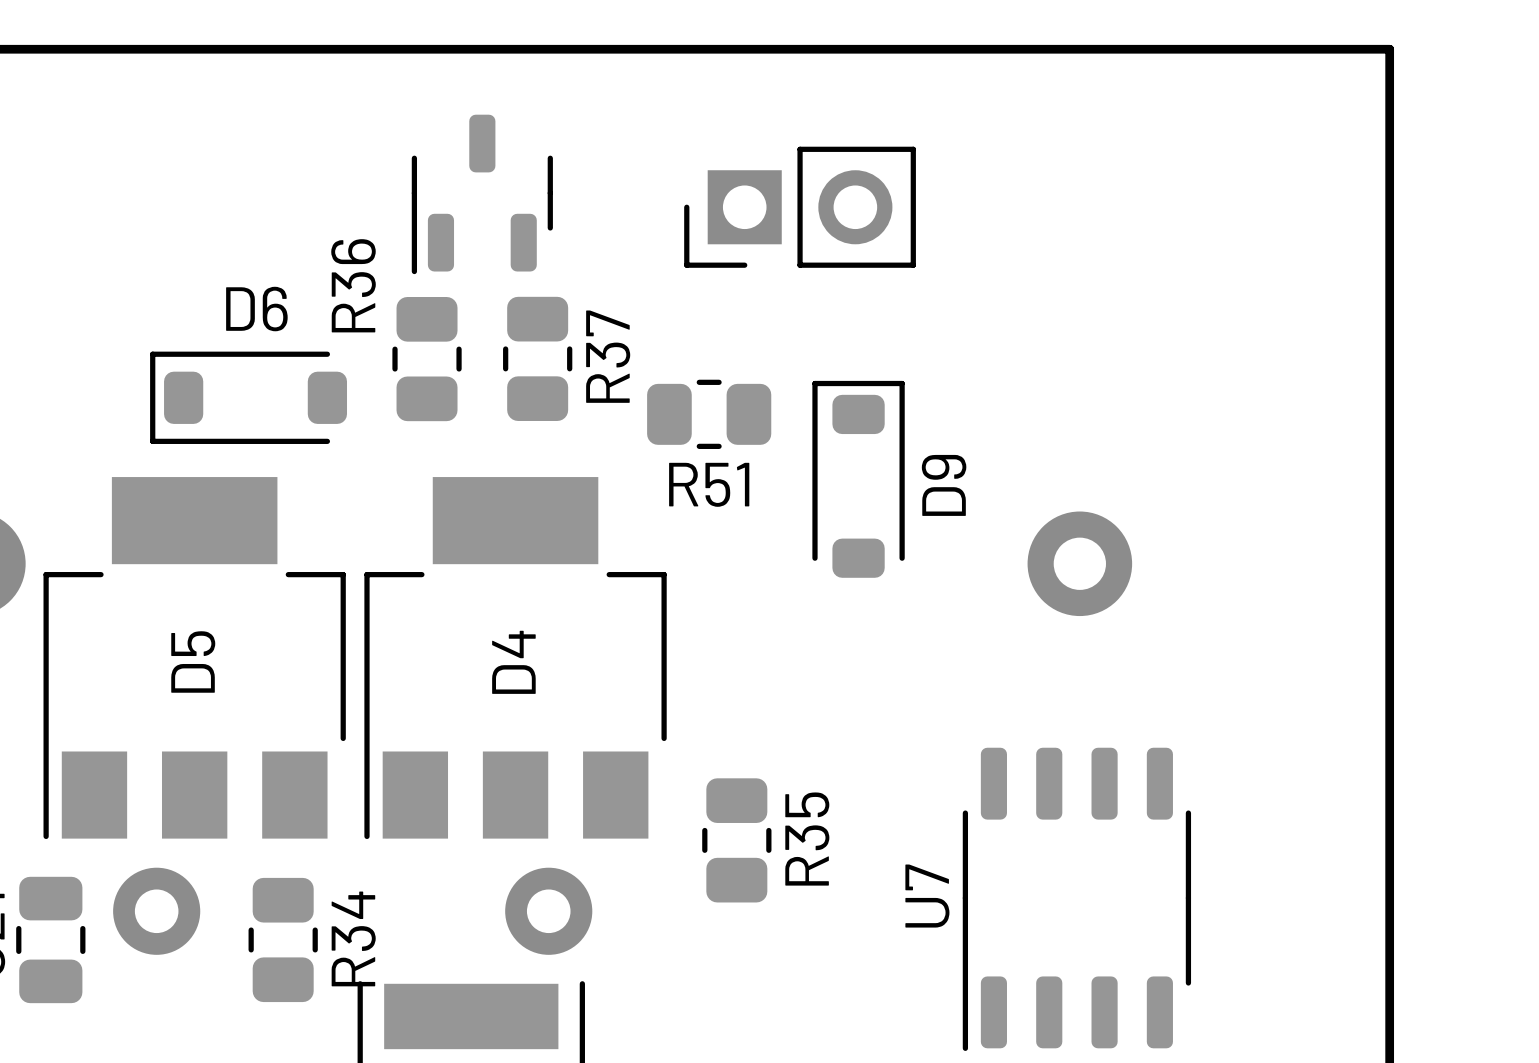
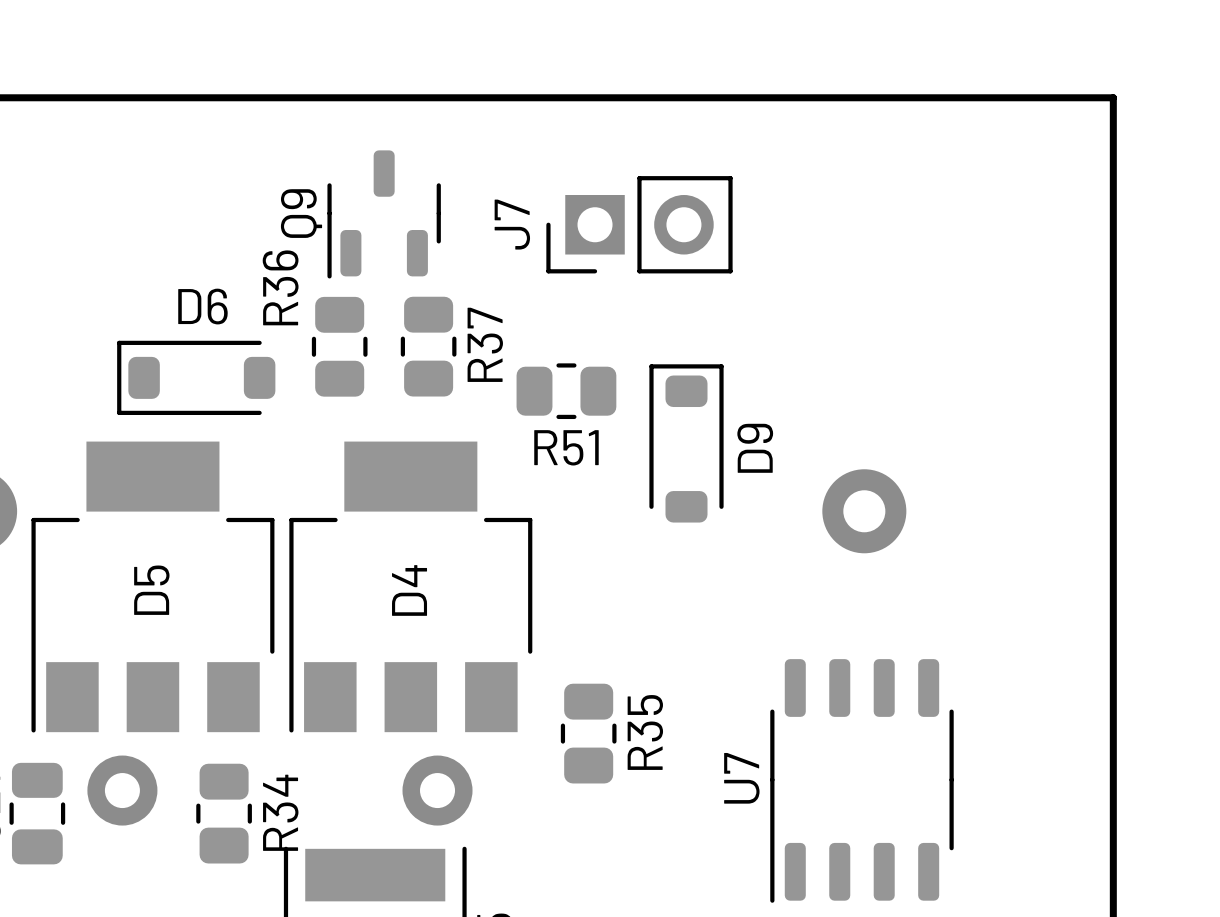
Q9 name: none -> Q9 (301, 213)
J7 name: none -> J7 (512, 224)

